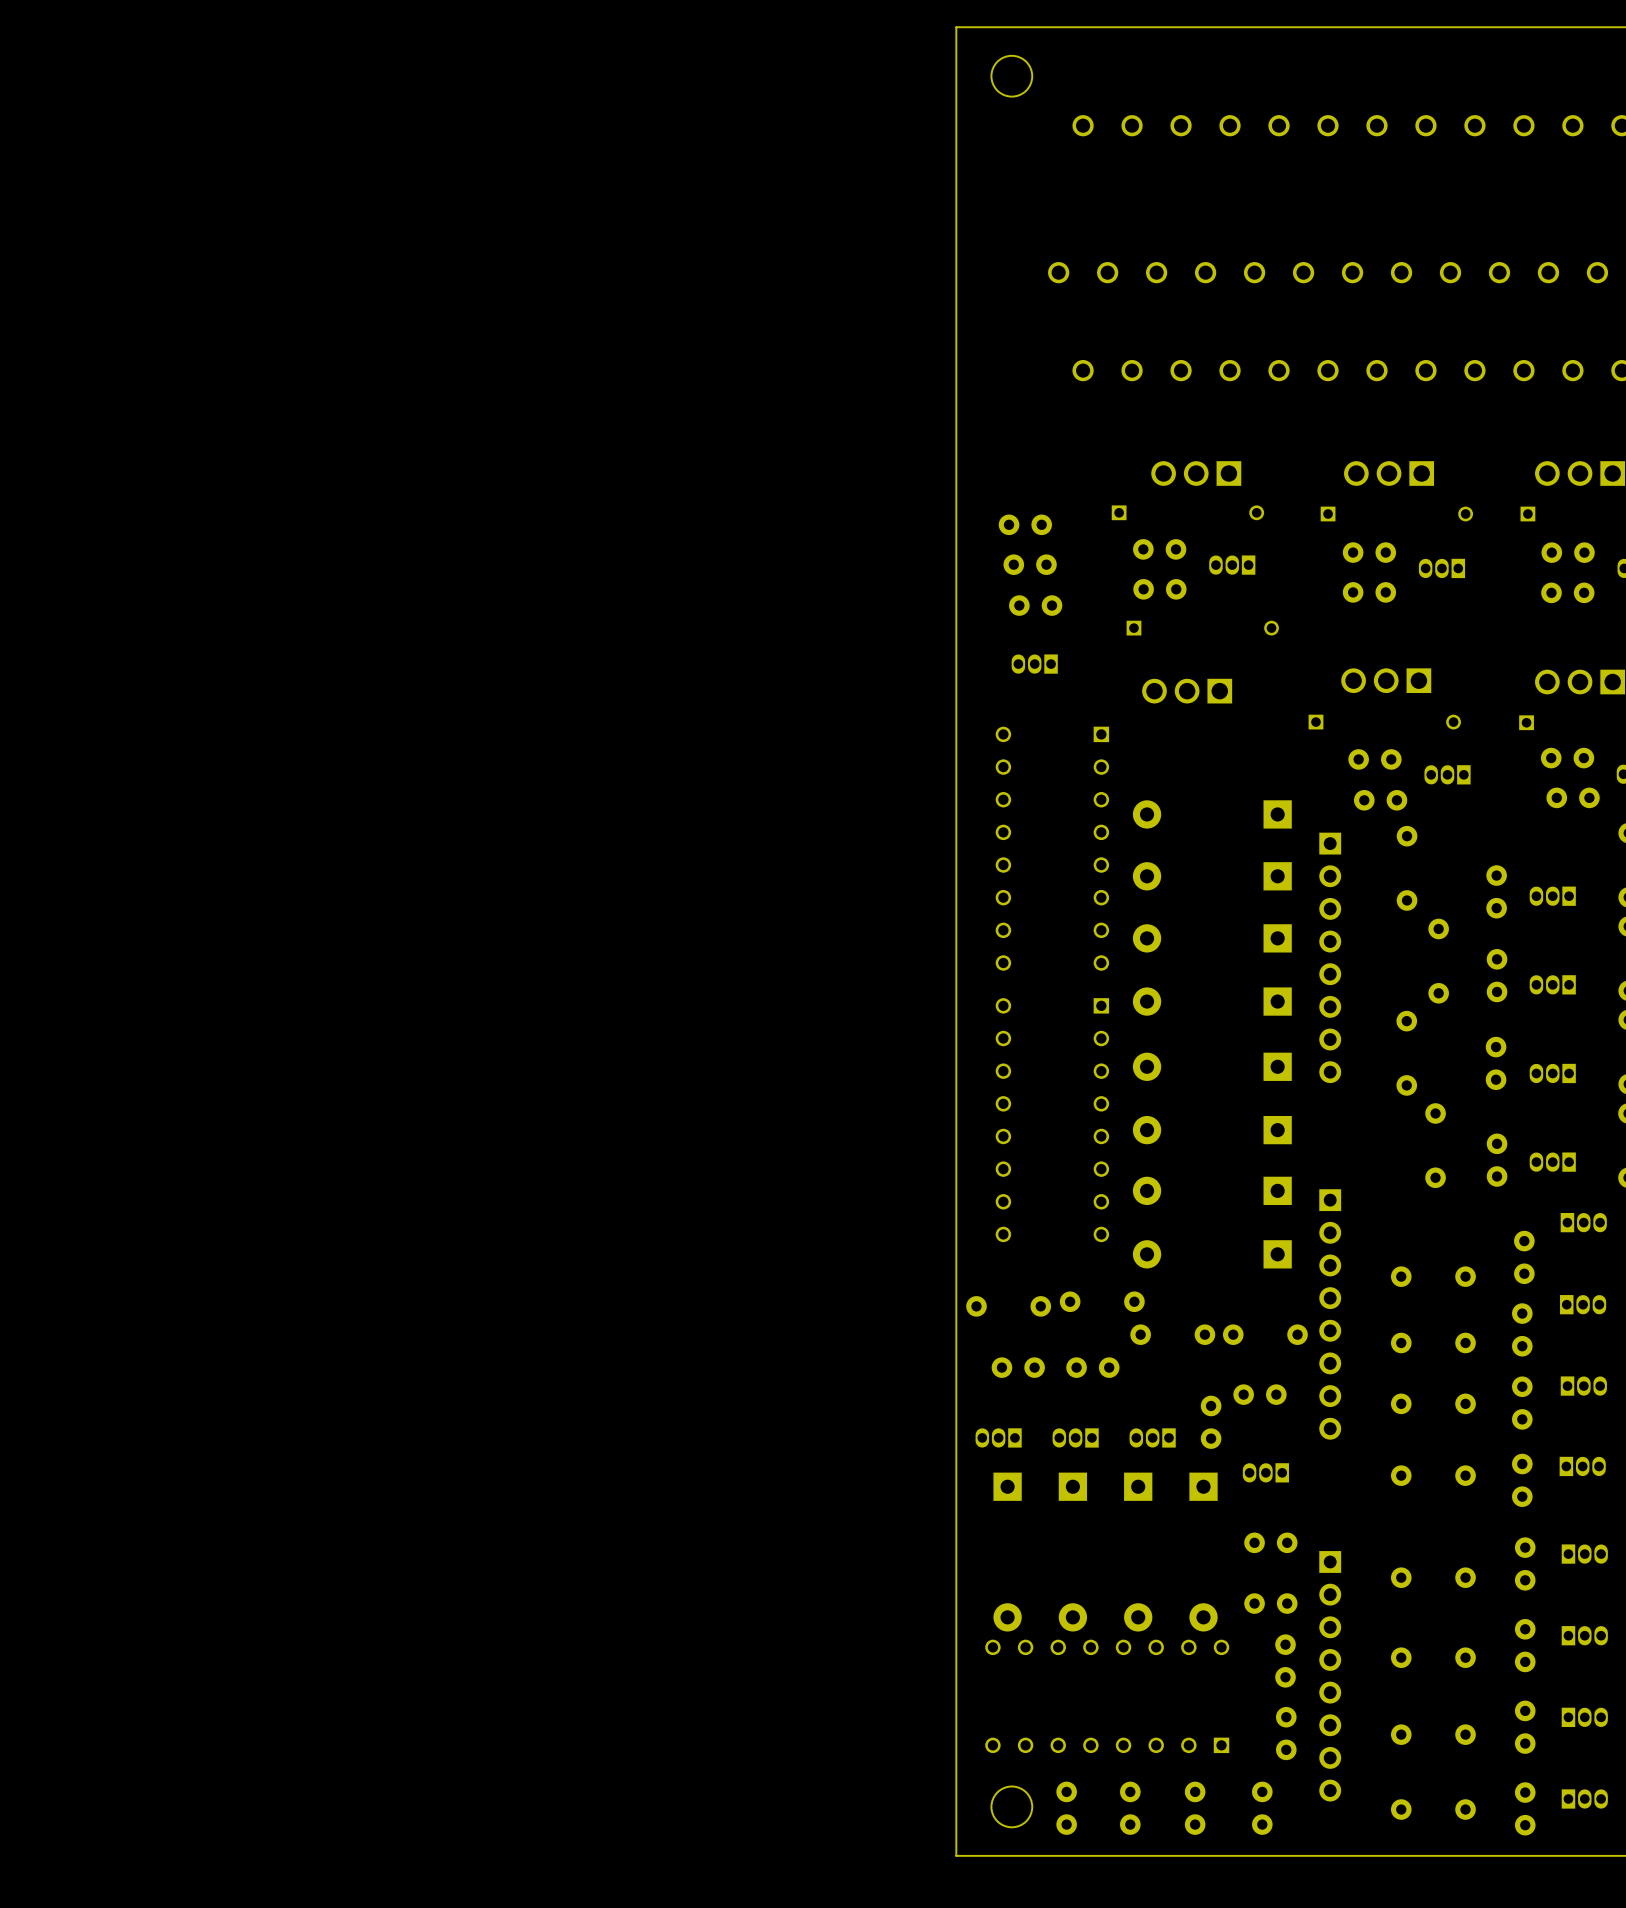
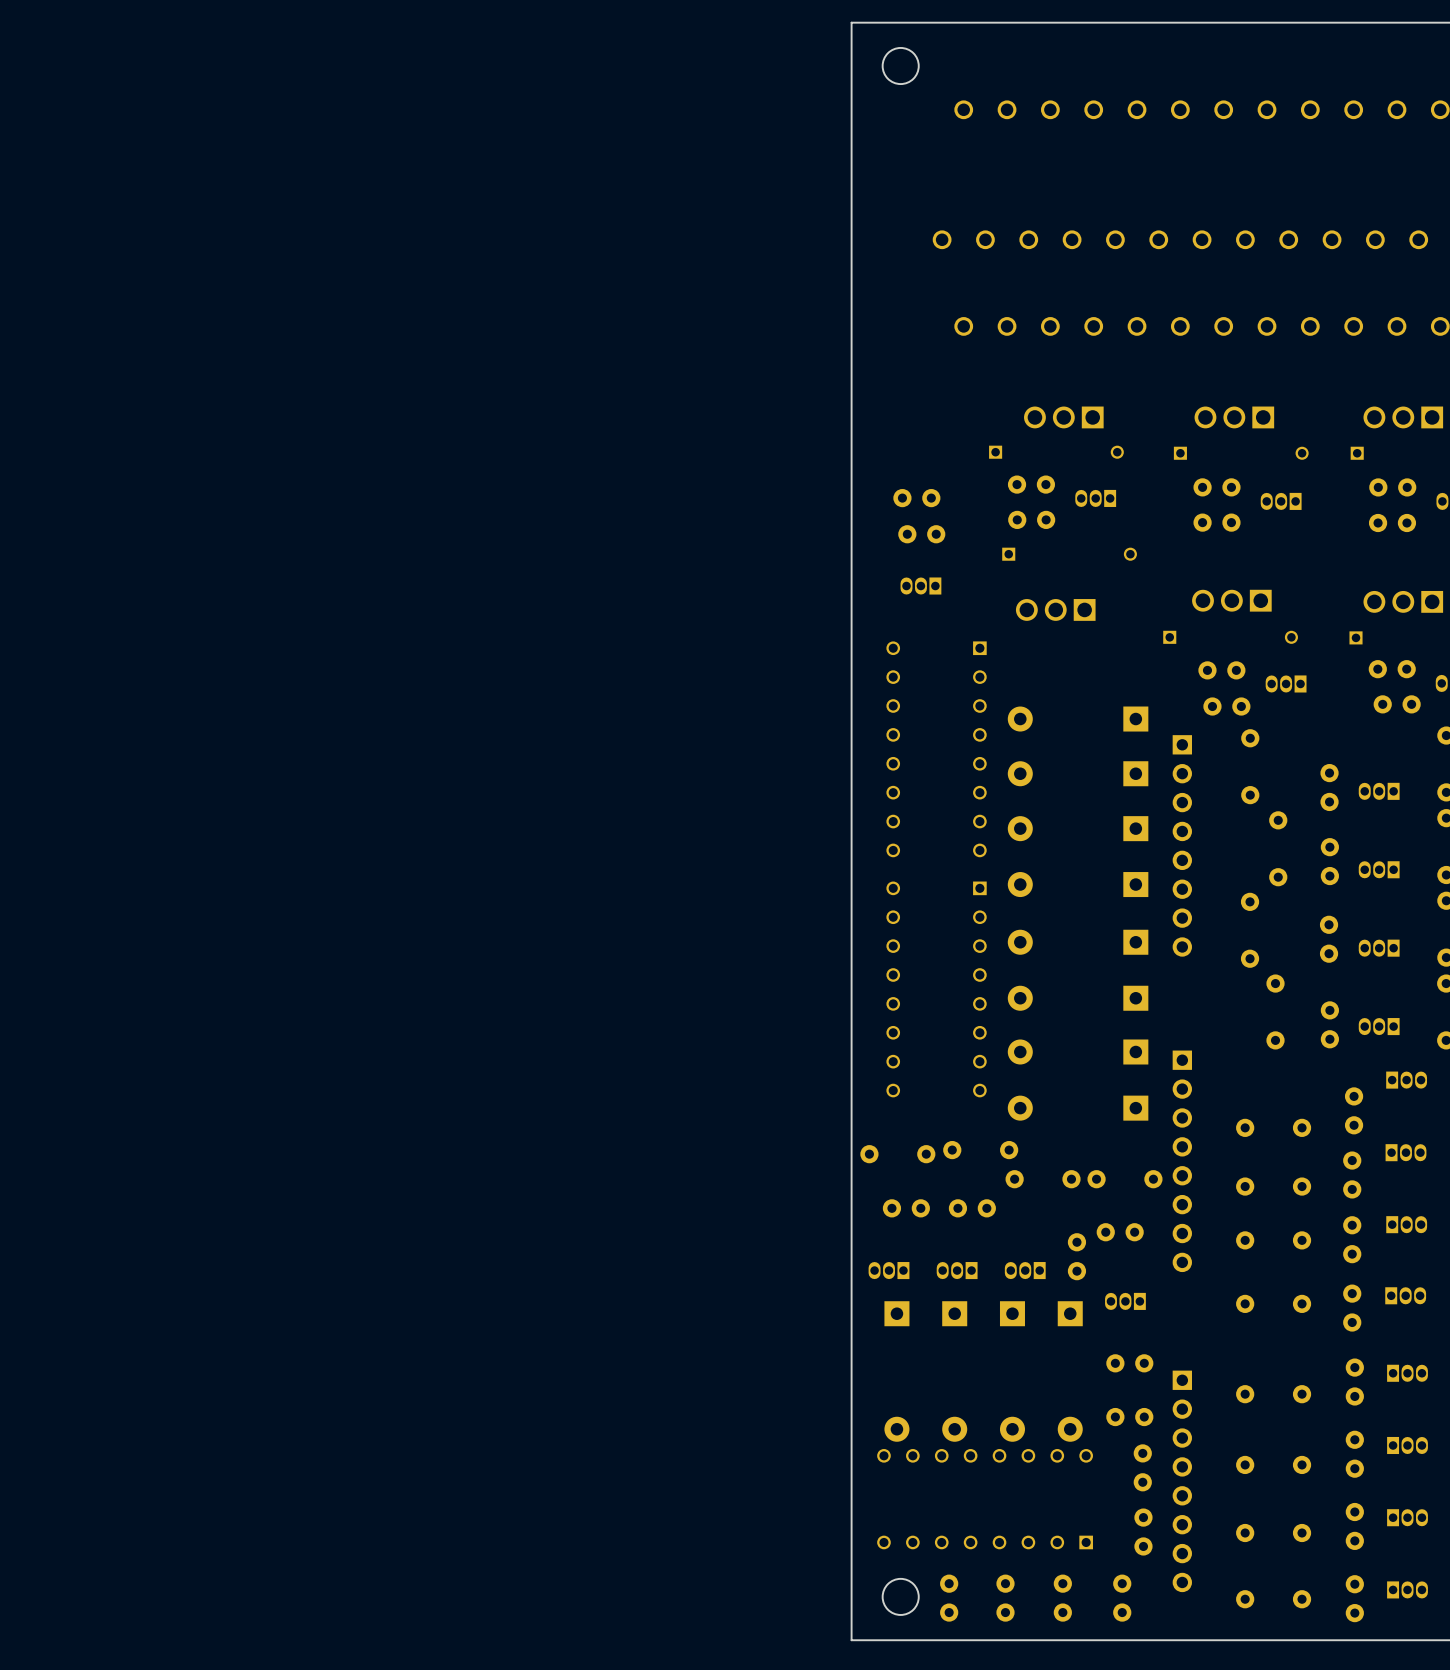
part: (1025, 524) -> none

